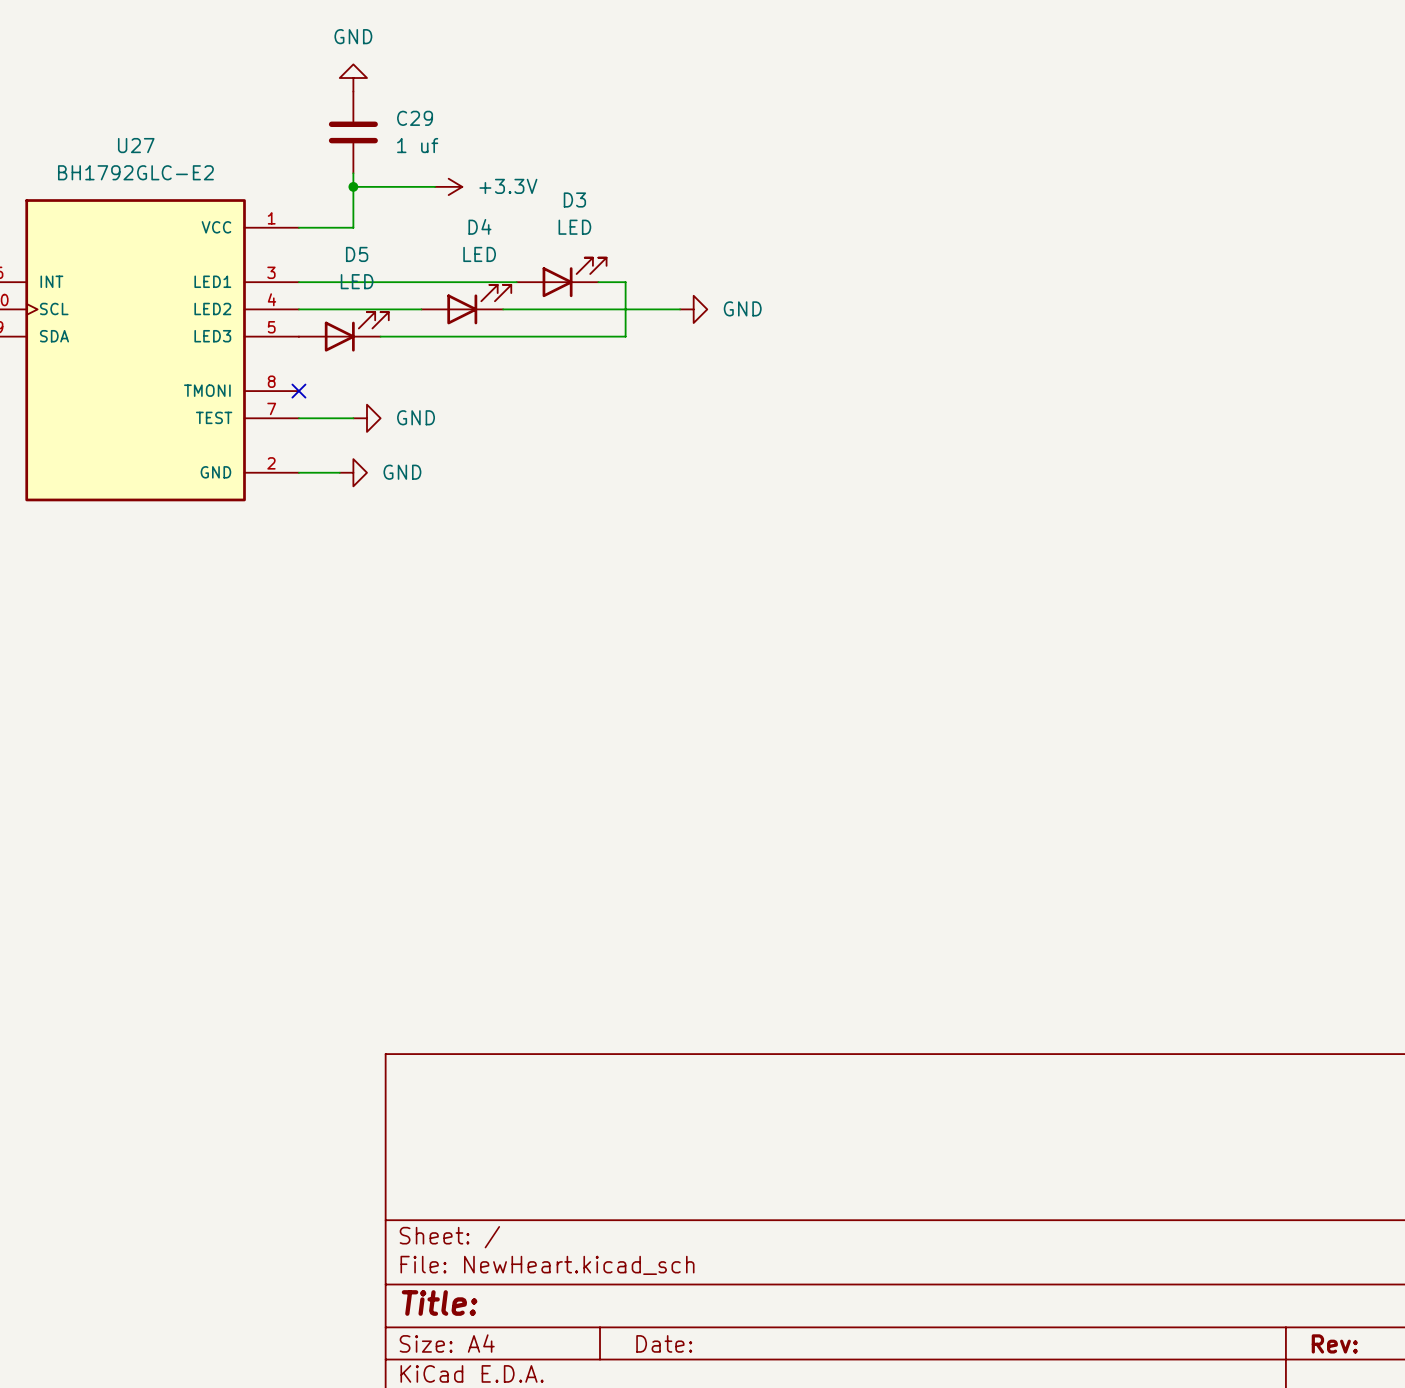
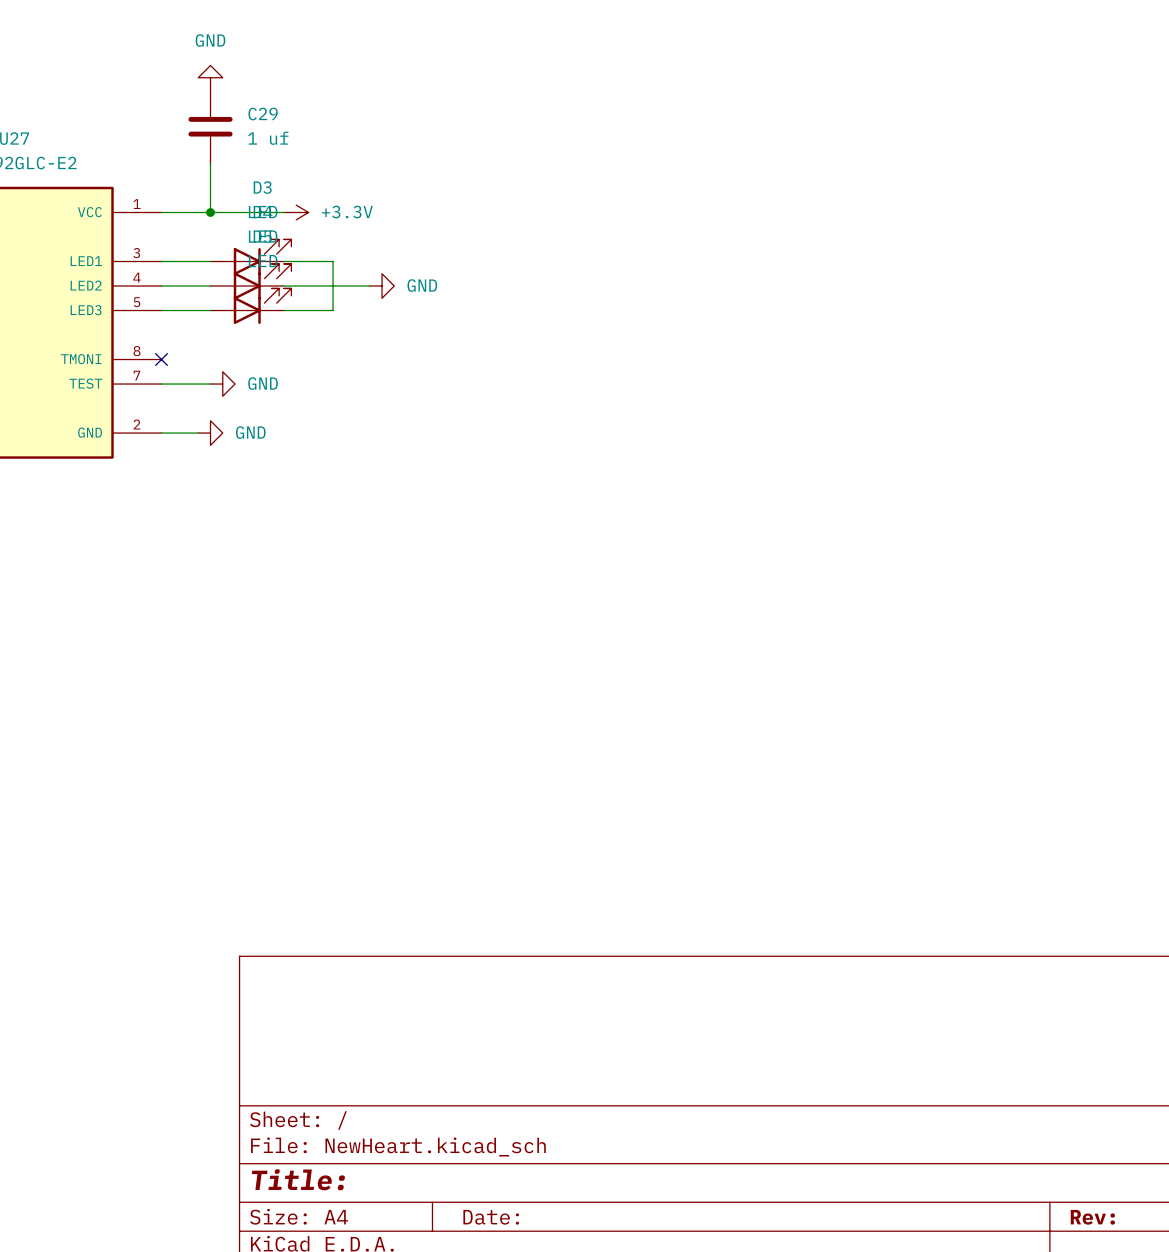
wire: (353, 186) (435, 186) -> (210, 212) (284, 212)
junction position: (353, 186) -> (210, 212)
power symbol position: +3.3V (448, 186) -> +3.3V (296, 212)
D3 position: (561, 277) -> (250, 257)
wire: (489, 282) (516, 282) -> (333, 261) (333, 310)
wire: (598, 282) (625, 282) (625, 336) (489, 336) -> none
D4 position: (466, 304) -> (250, 281)
wire: (530, 309) (680, 309) -> none
power symbol position: GND (693, 309) -> GND (382, 286)
D5 position: (343, 331) -> (250, 306)

